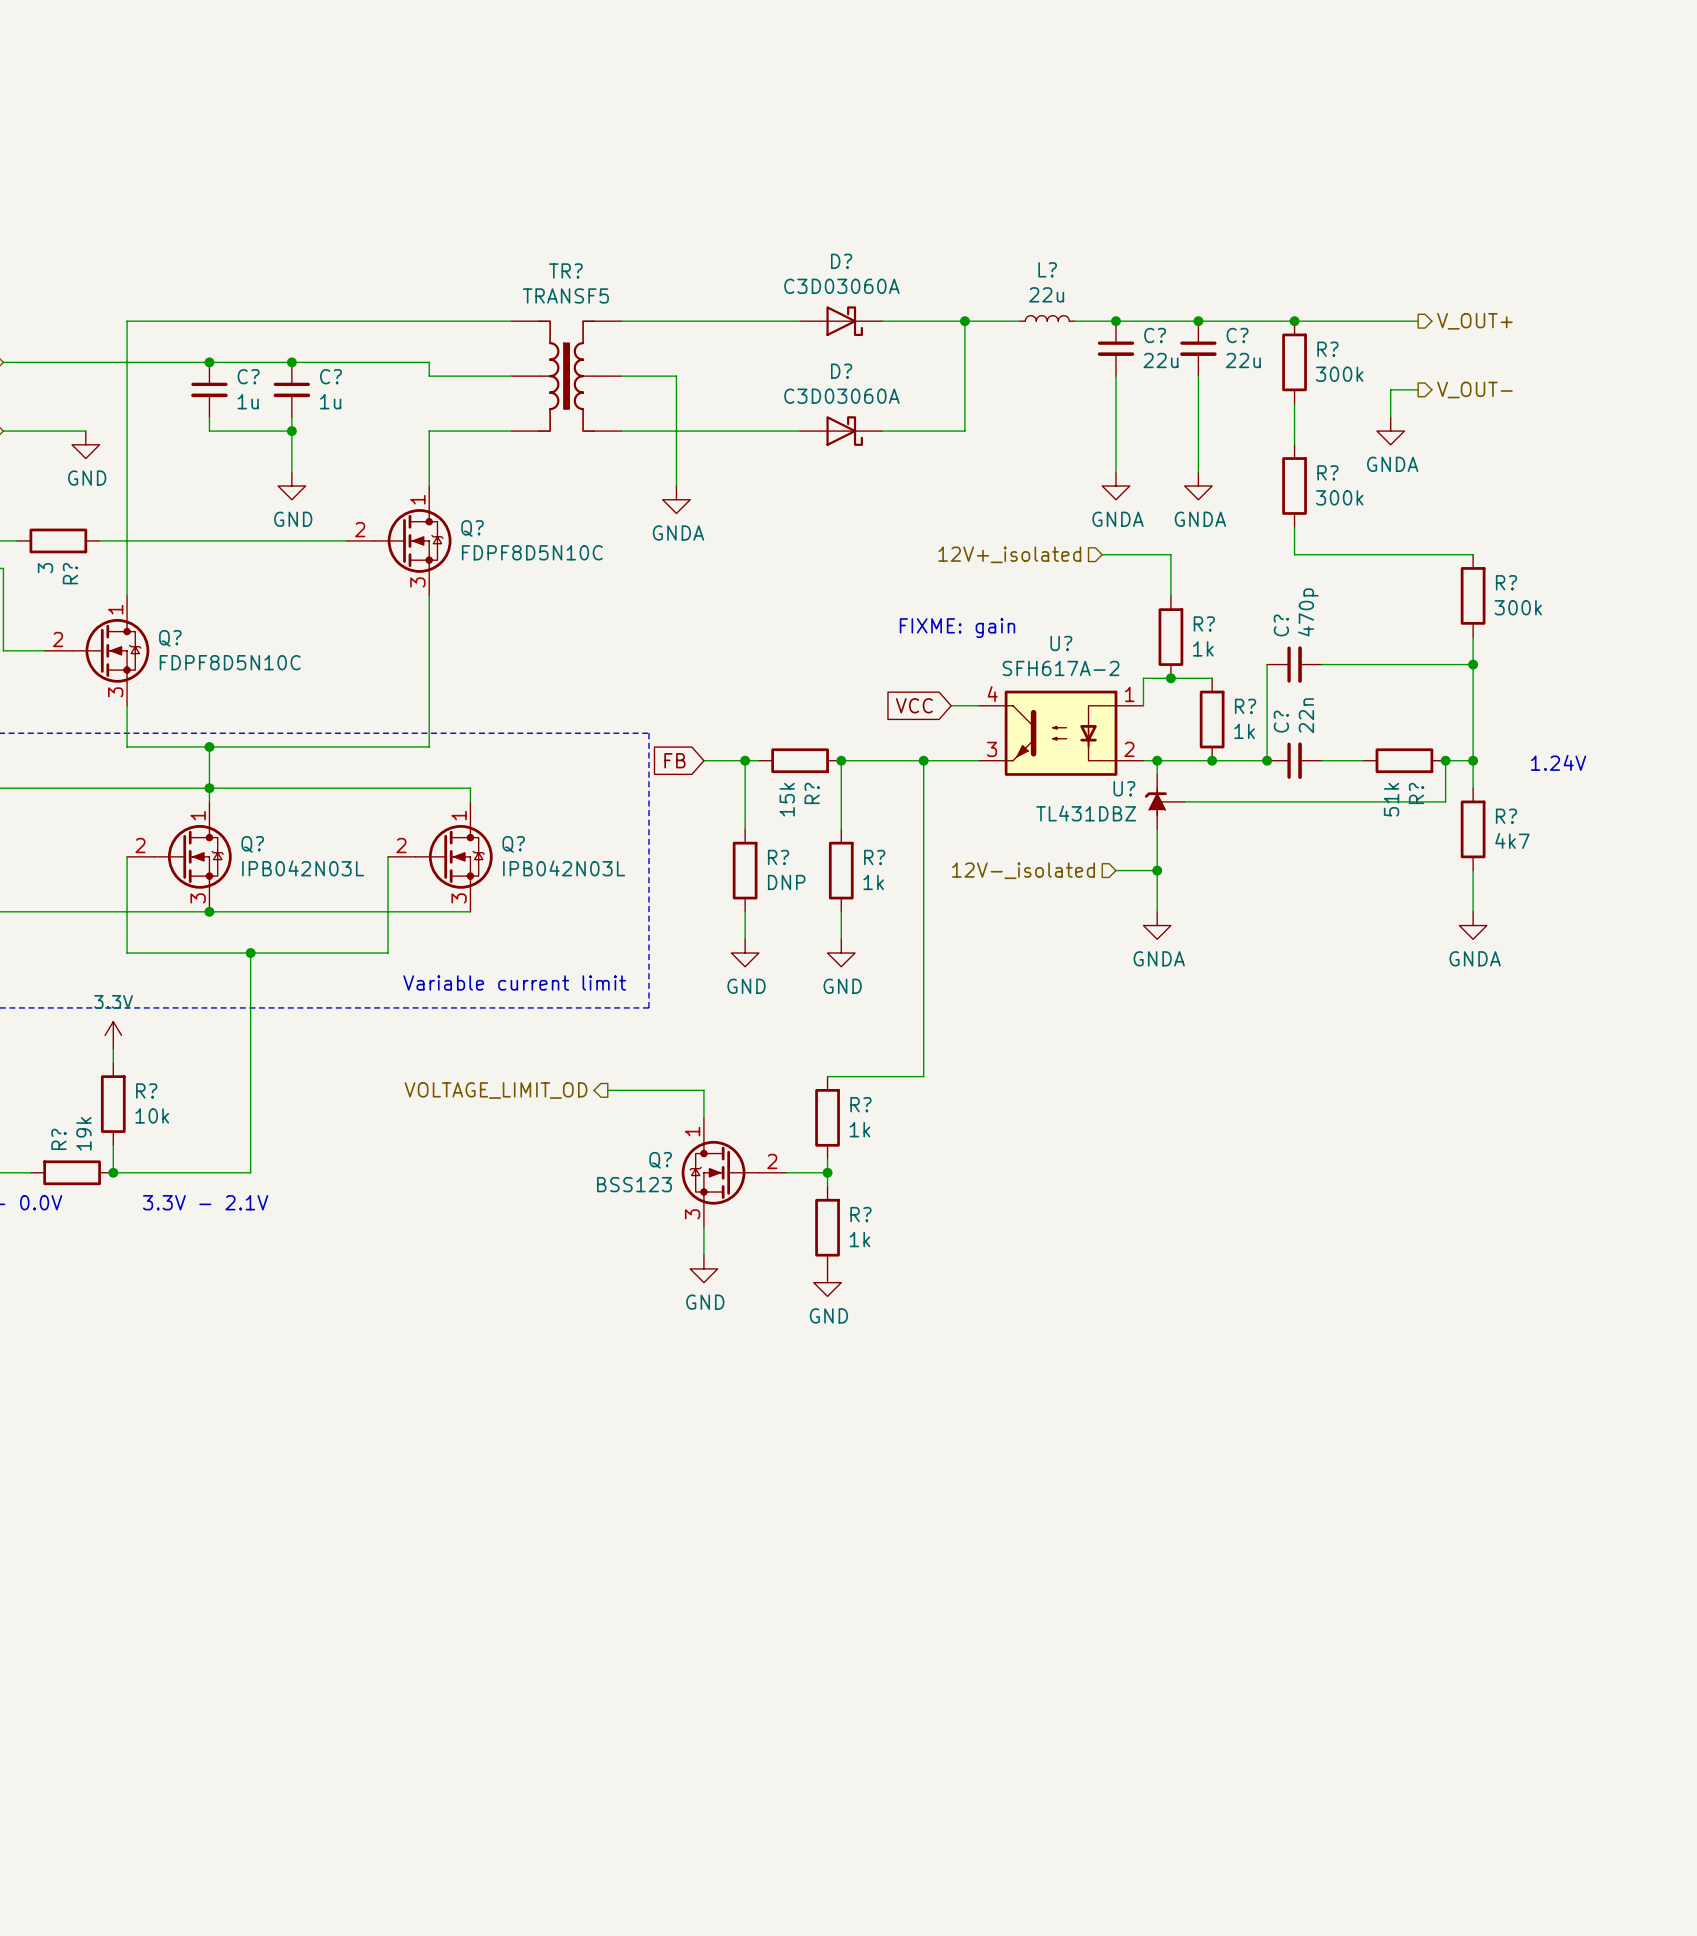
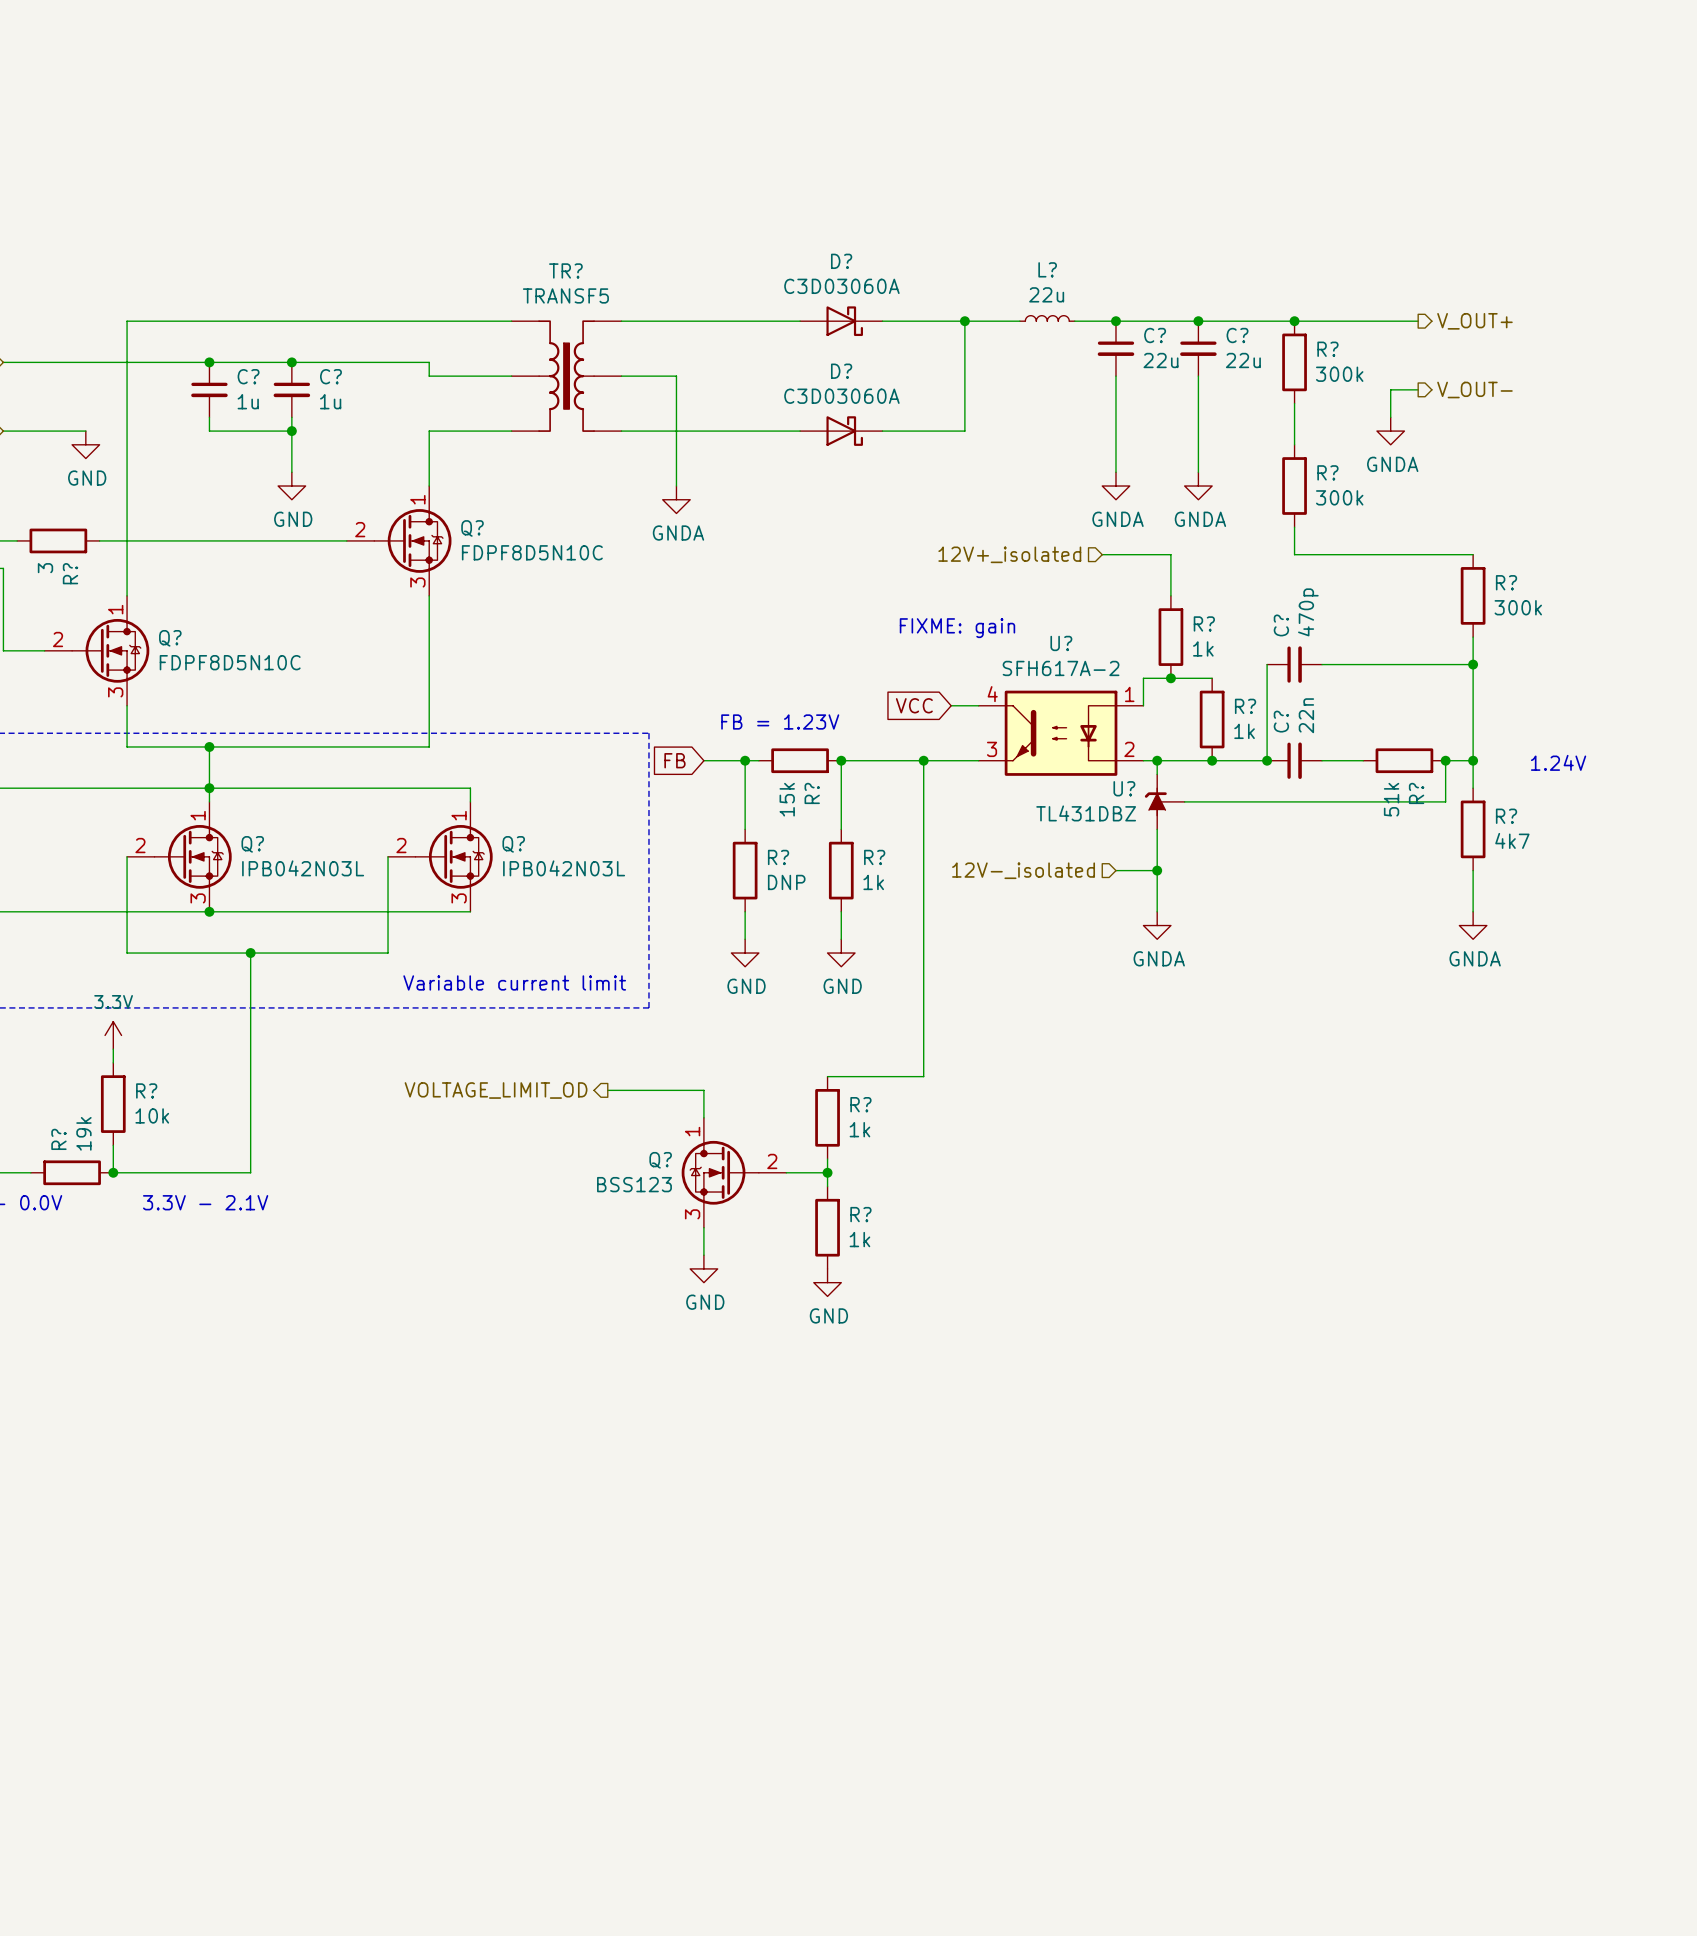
text: none -> FB = 1.23V (780, 721)

